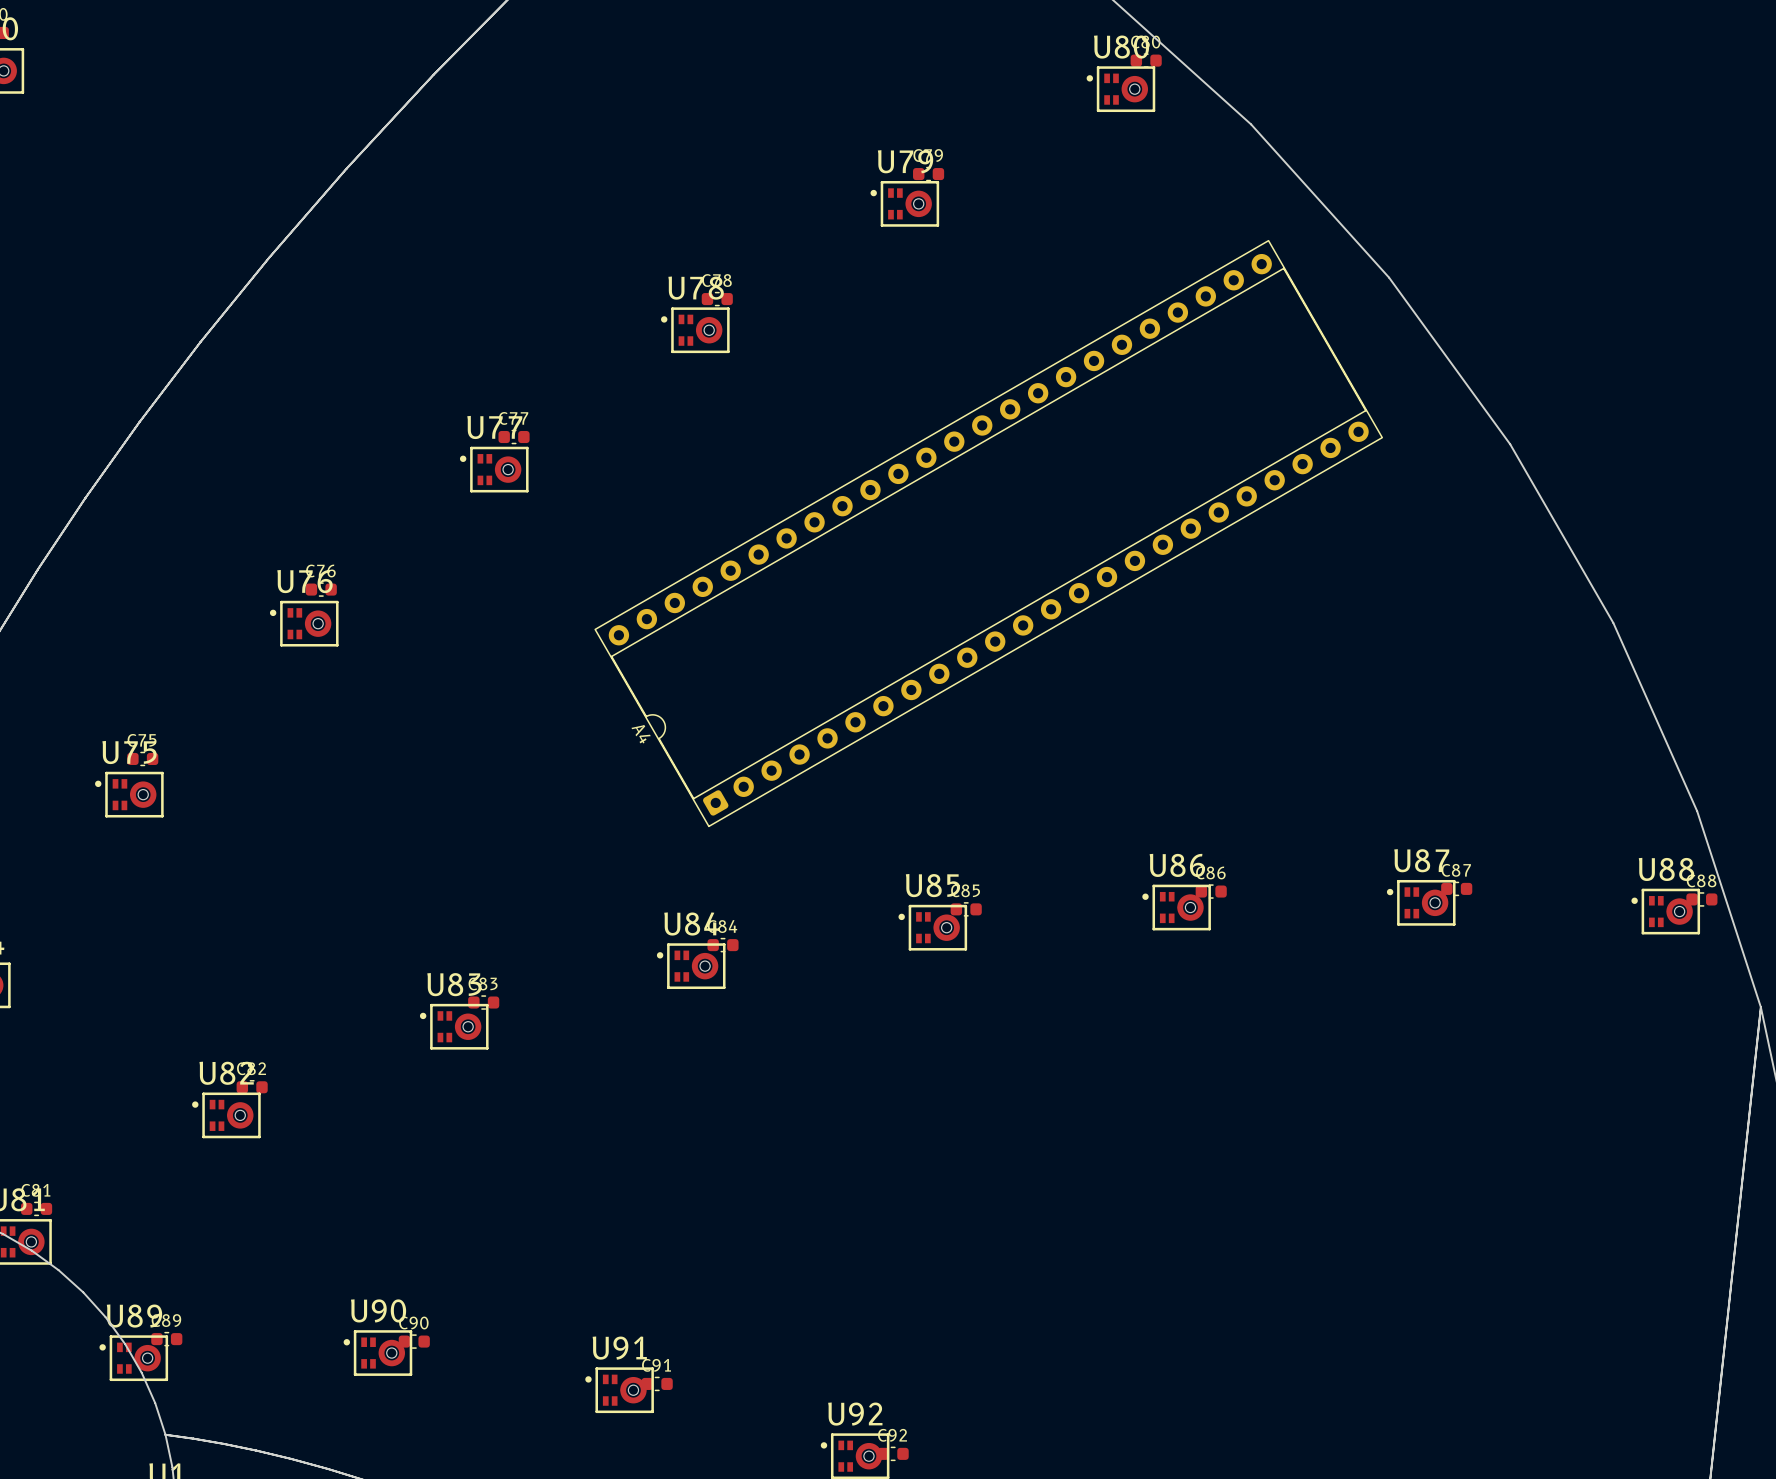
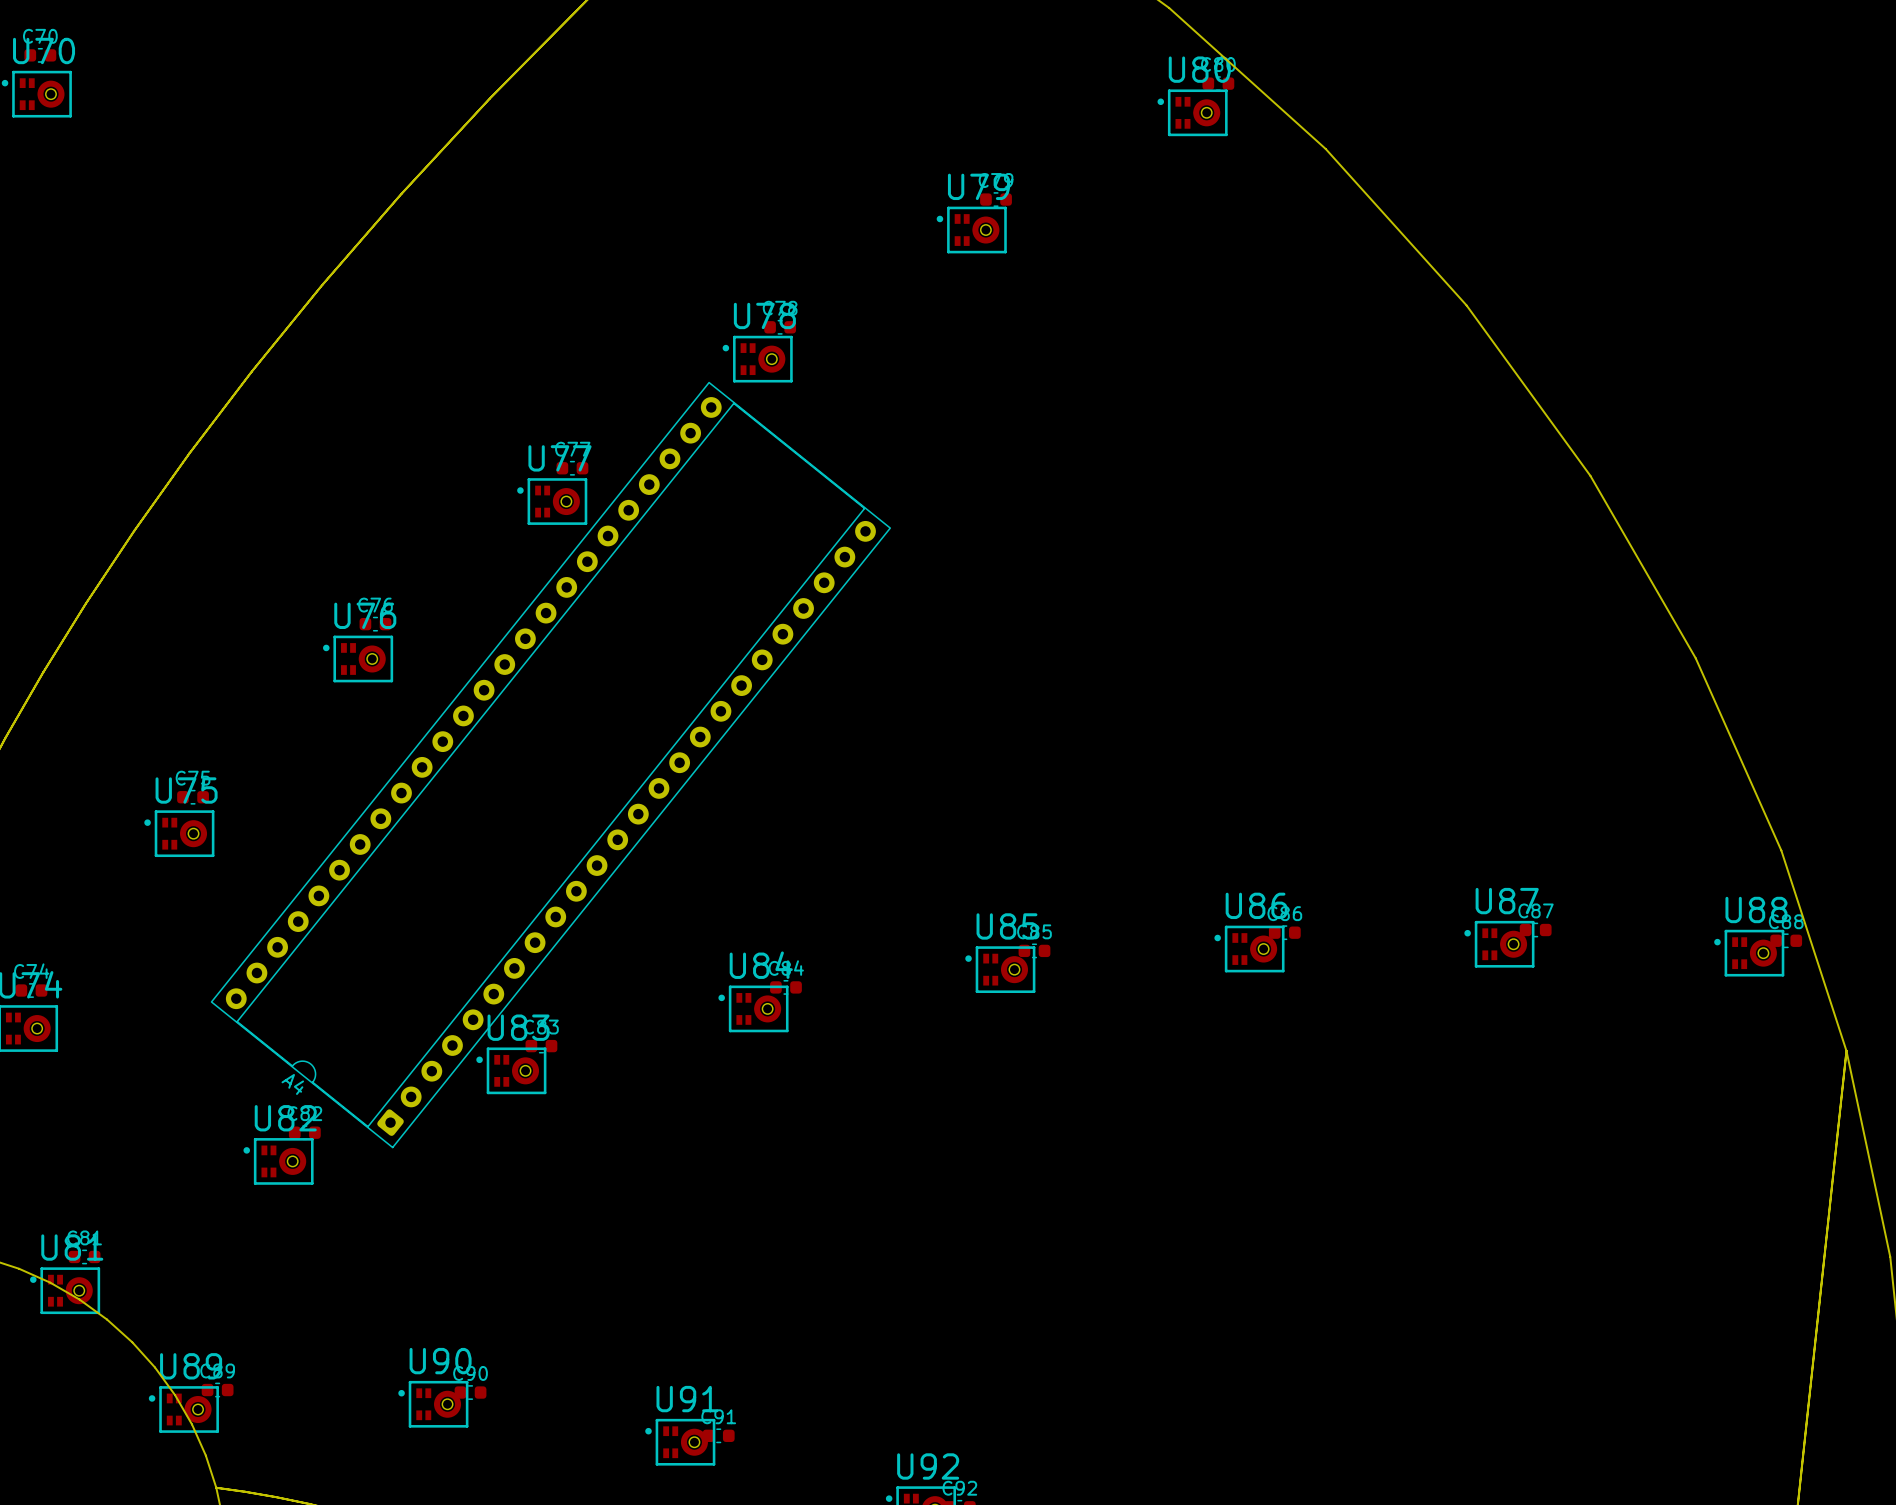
A4 footprint: [594, 239, 1384, 828] -> [210, 381, 892, 1149]
A4 name position: A4 (641, 734) -> A4 (292, 1084)

